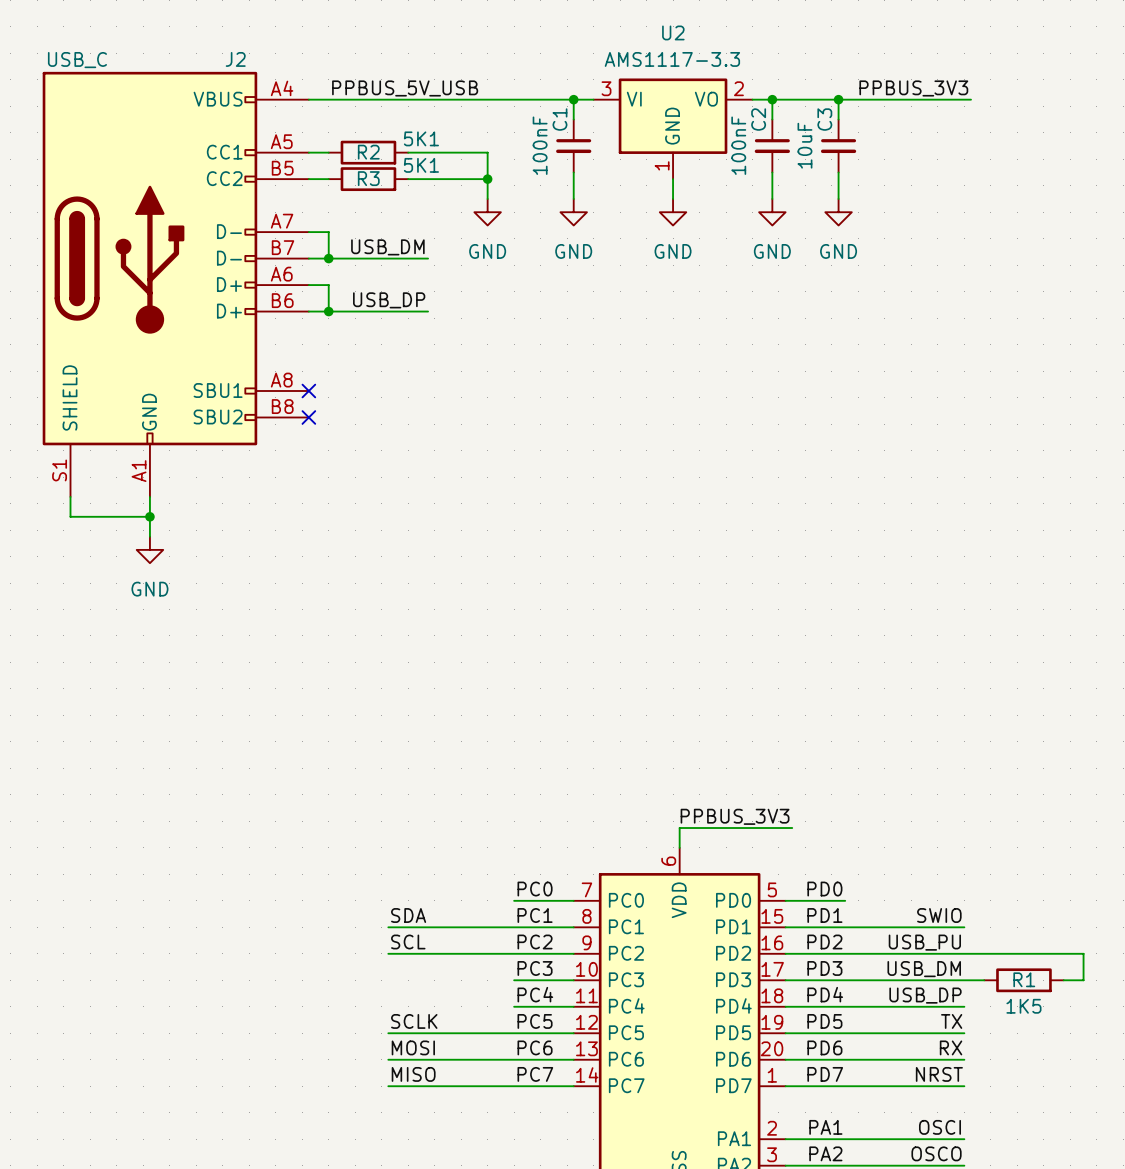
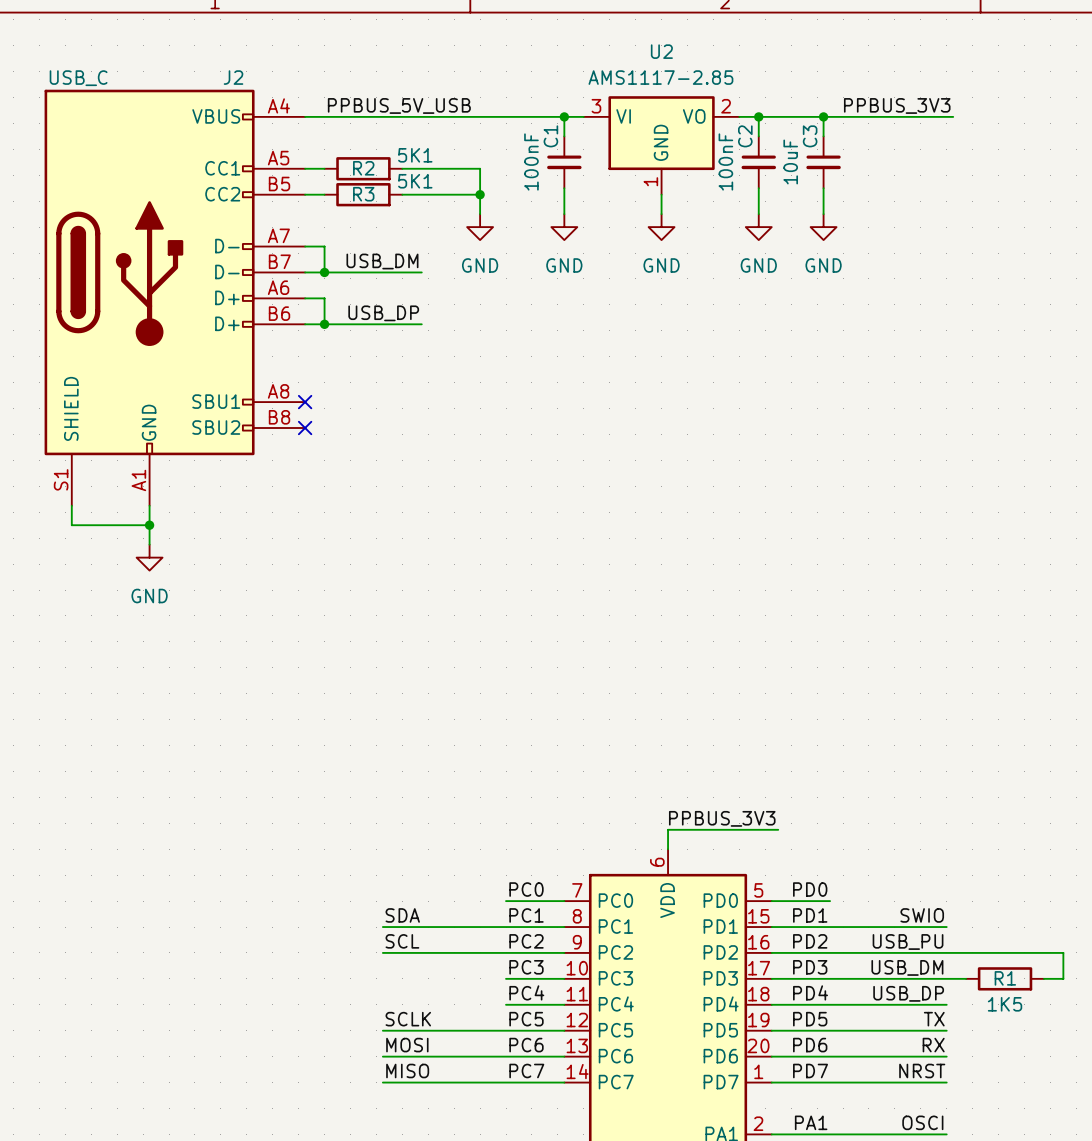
U2 value: AMS1117-3.3 (672, 59) -> AMS1117-2.85 (660, 77)

